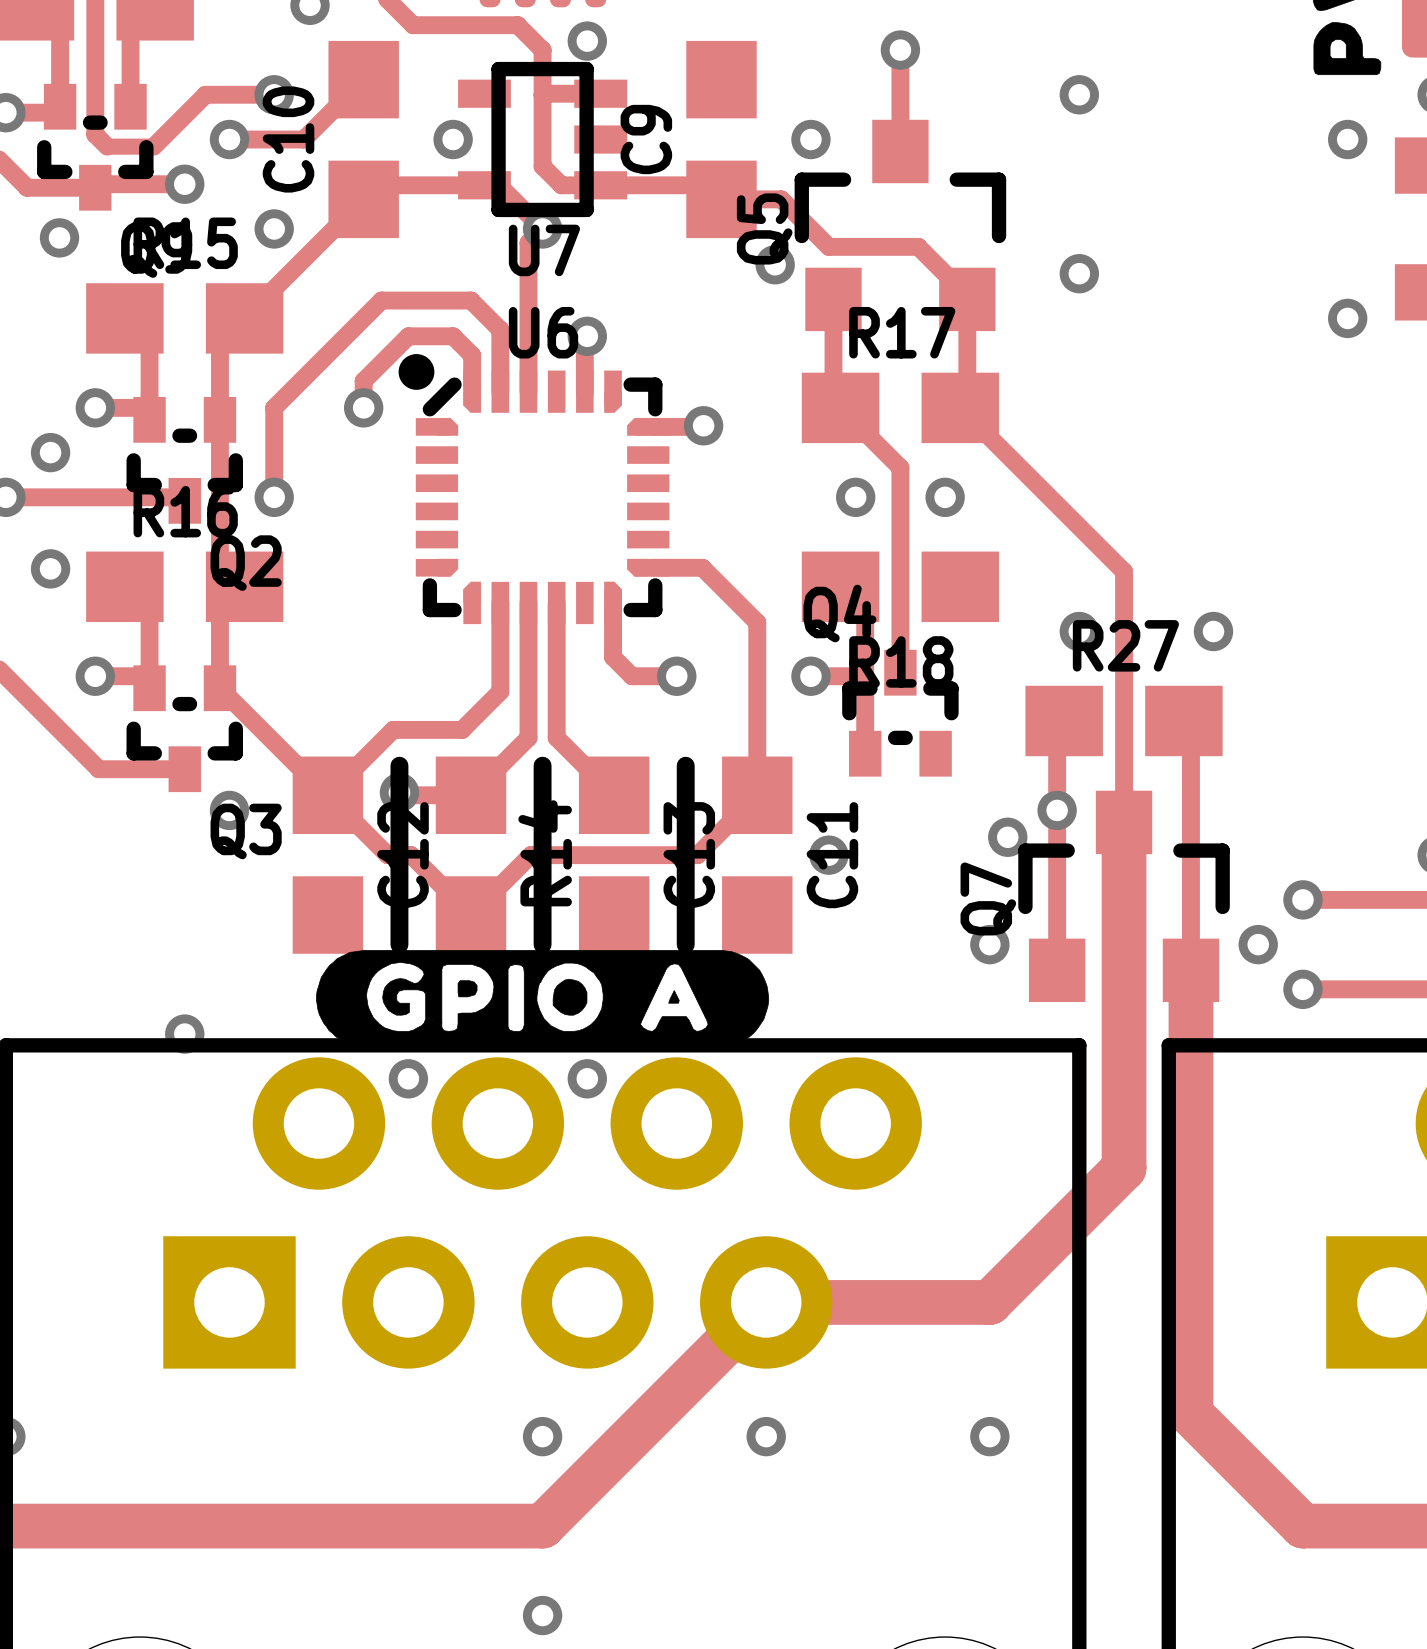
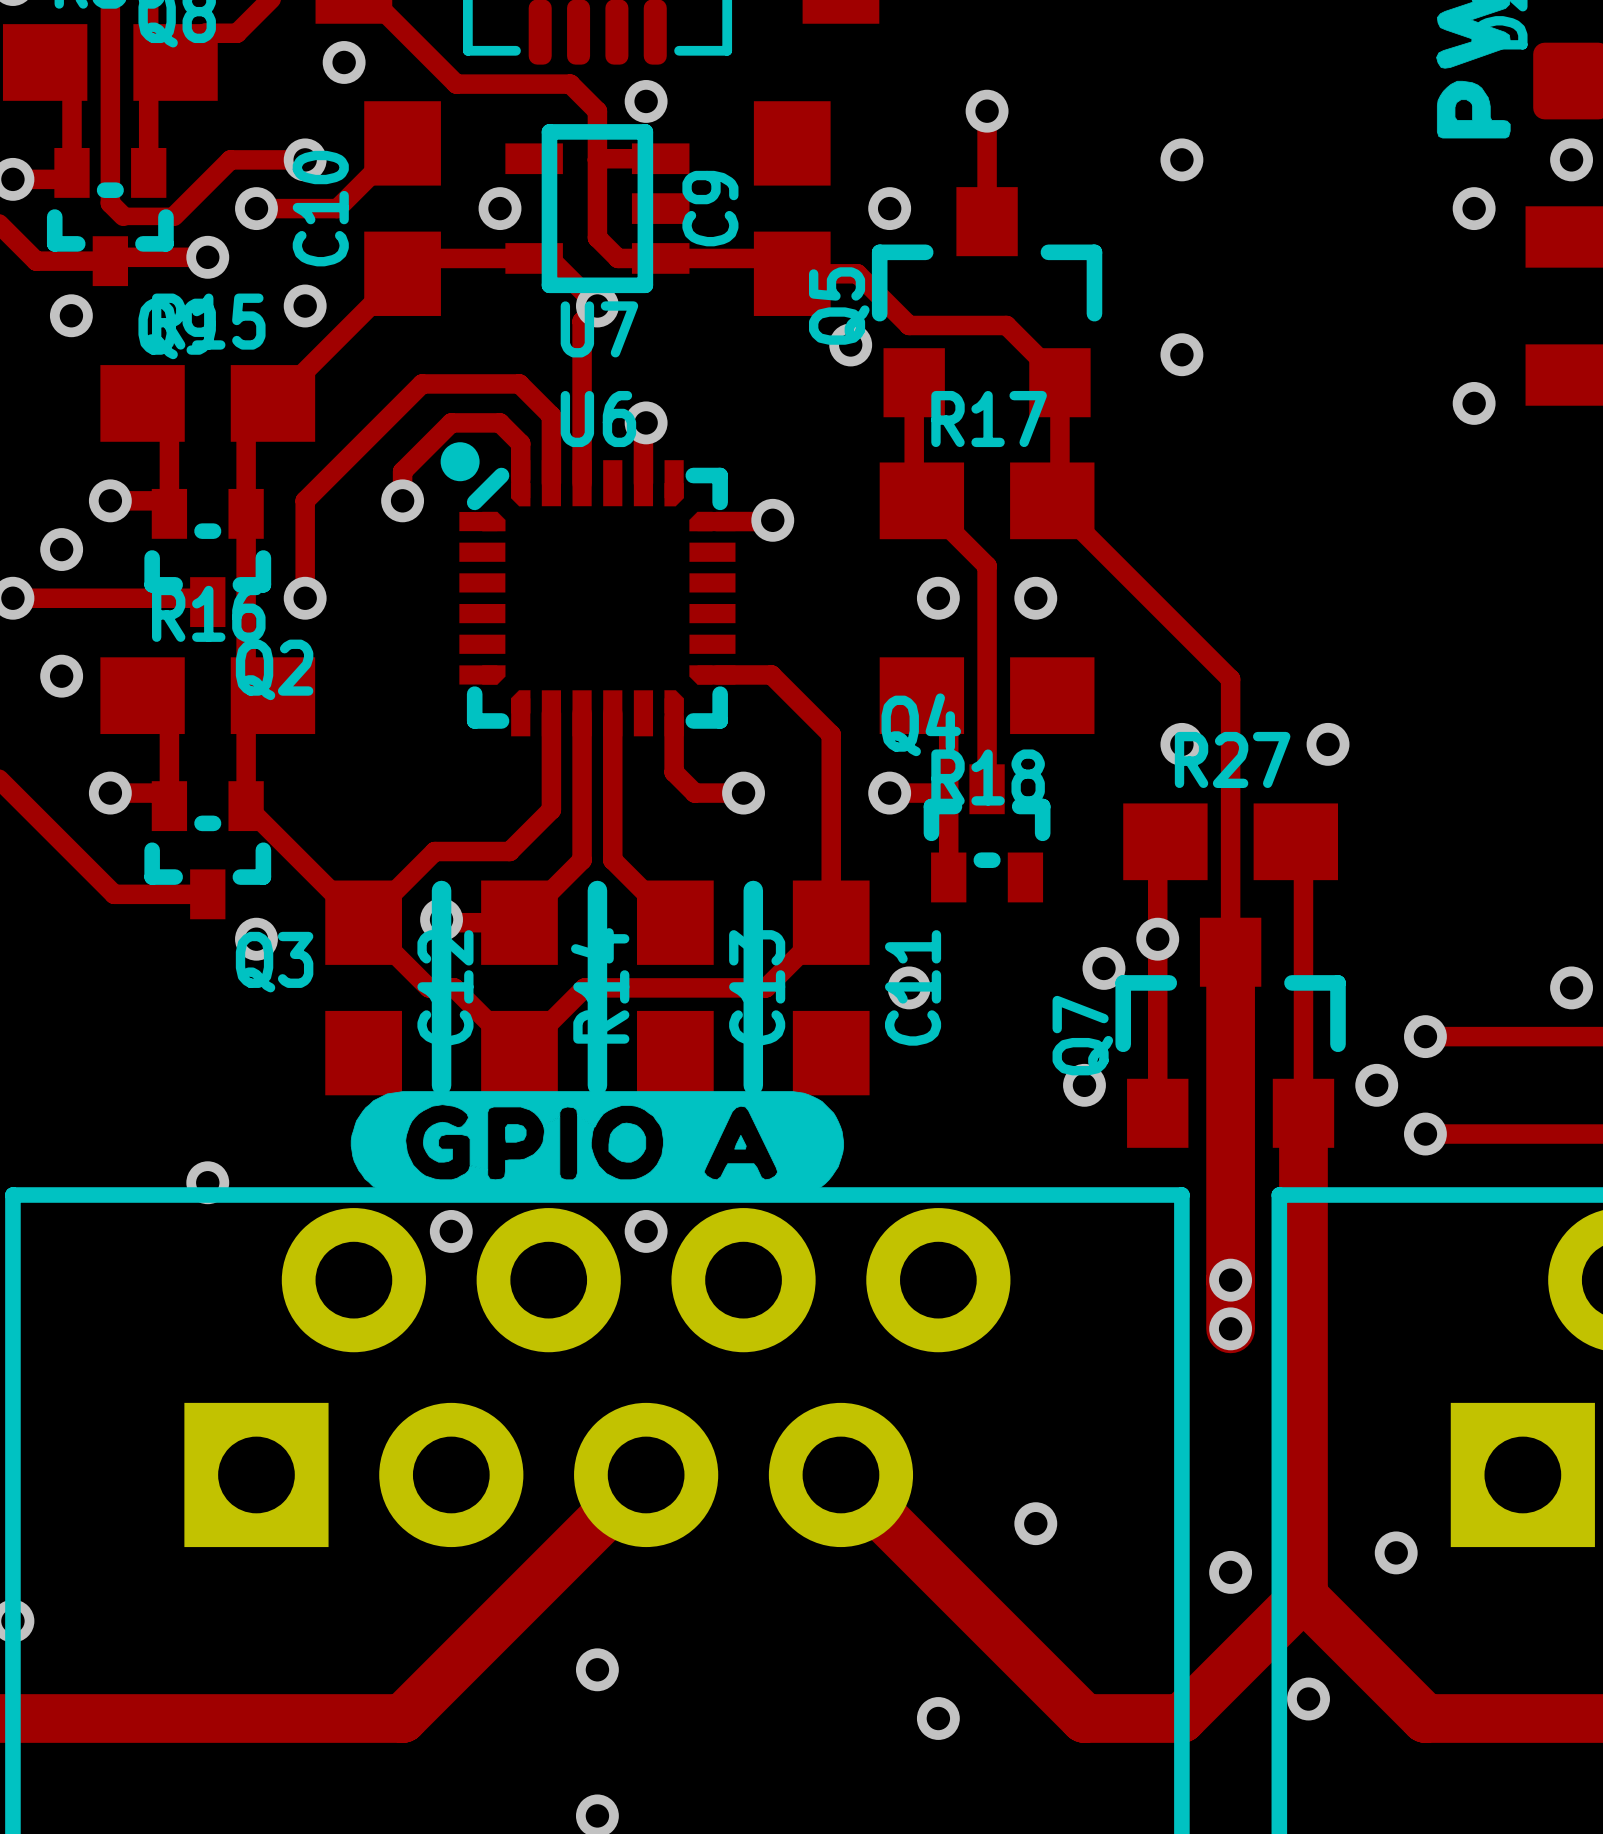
via: none -> (1230, 1280)
track: (1124, 1168) (989, 1302) (766, 1302) (542, 1526) (363, 1526) -> (646, 1474) (402, 1718)
via: none -> (1230, 1328)
track: none -> (840, 1474) (1084, 1718) (1181, 1718) (1303, 1596)
via: none -> (1035, 1523)
via: none -> (1396, 1552)
via: none -> (1230, 1572)
via position: (542, 1436) -> (597, 1669)
via: (766, 1436) -> none
via: (989, 1436) -> none
via: none -> (1308, 1699)
via: none -> (938, 1718)

